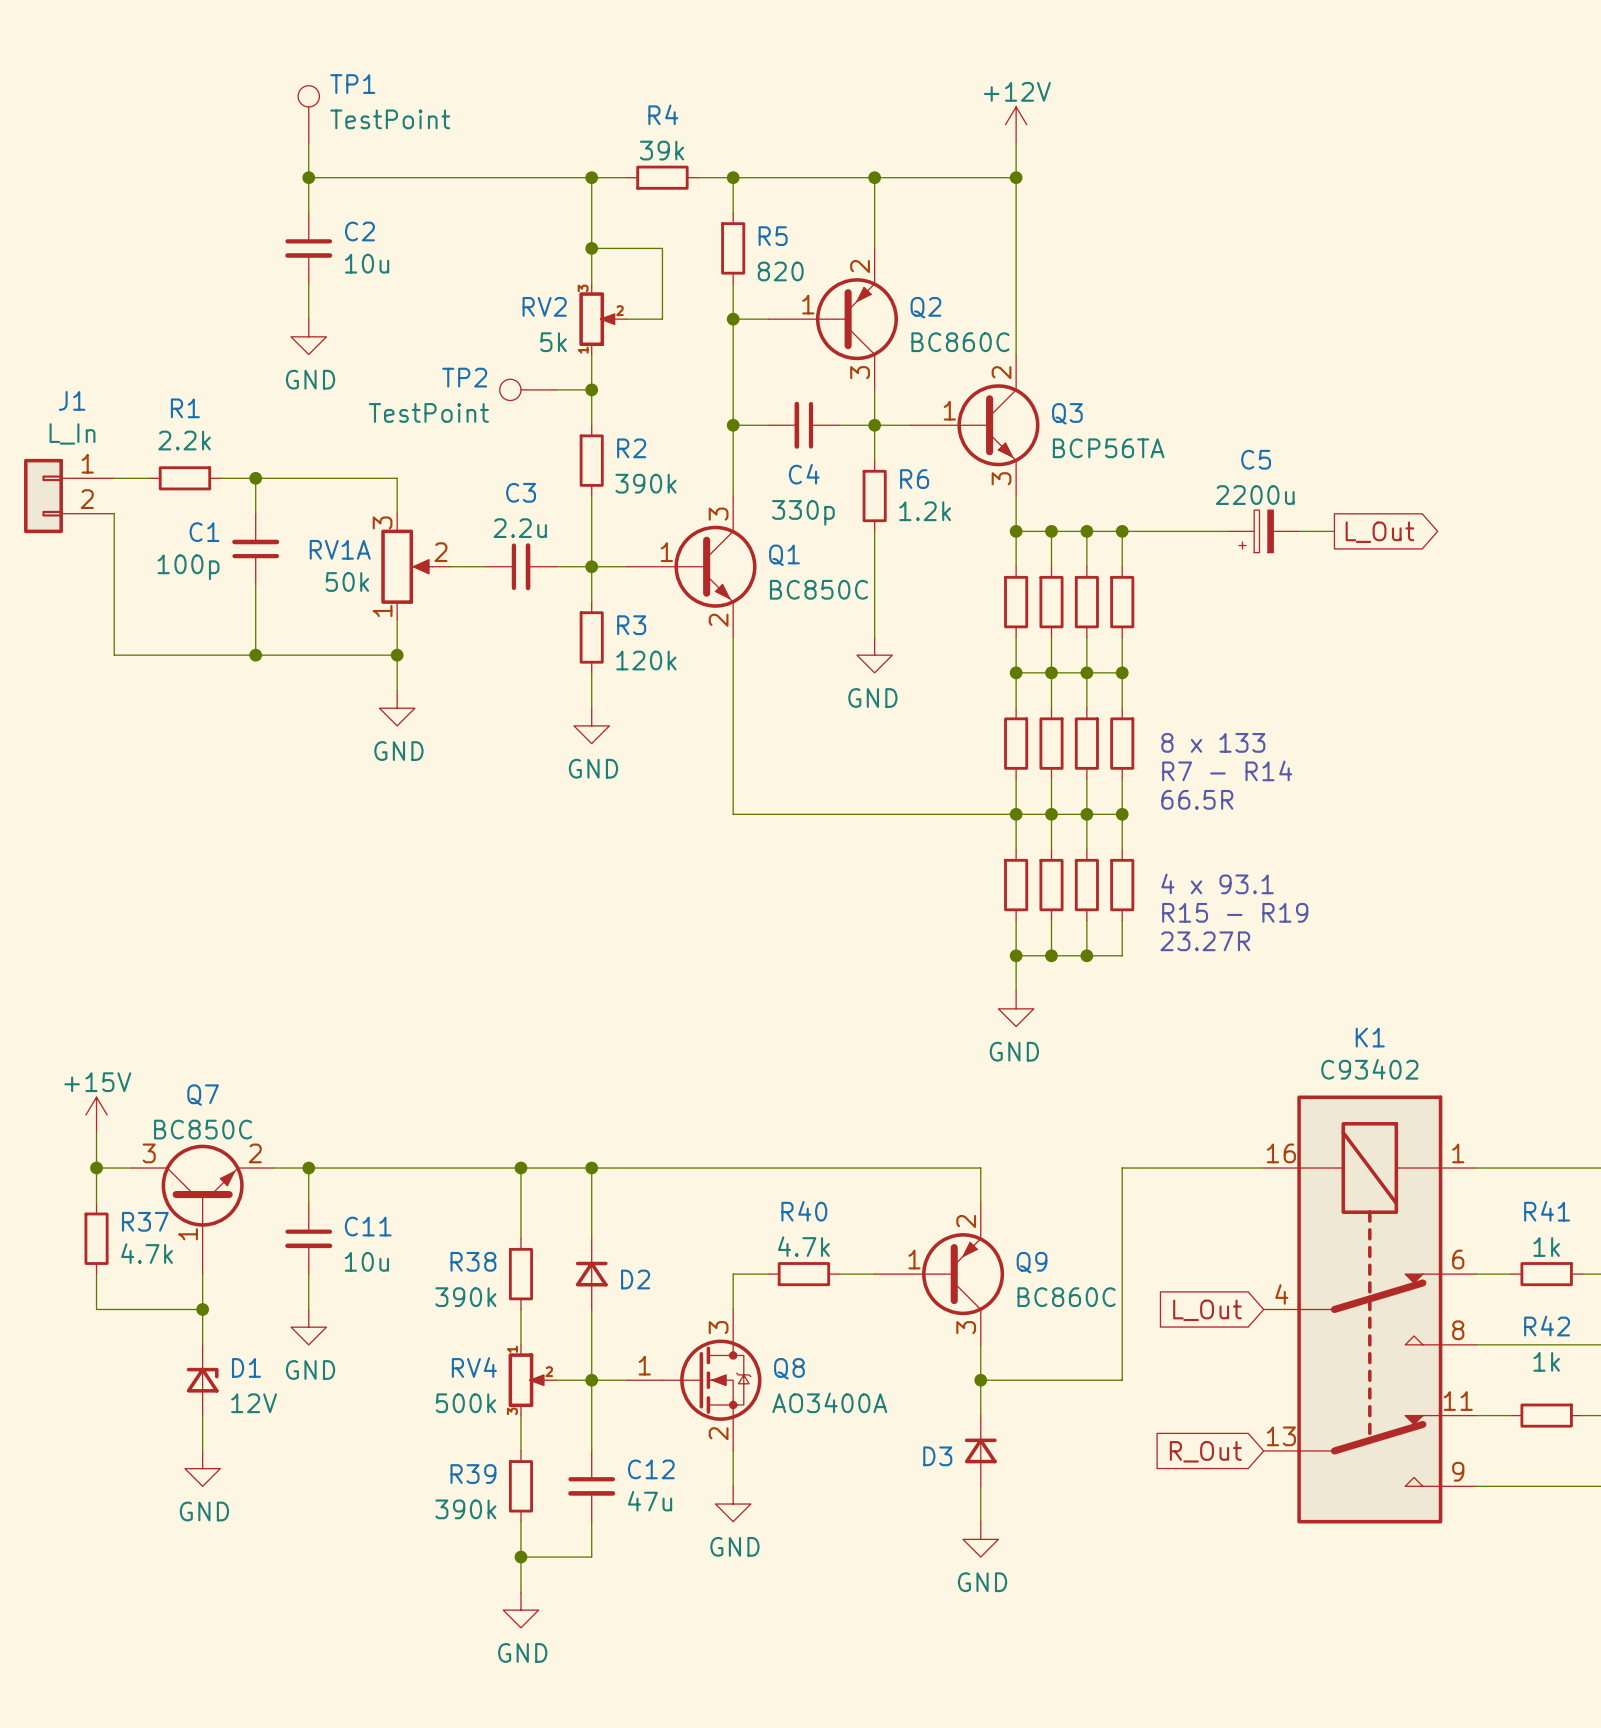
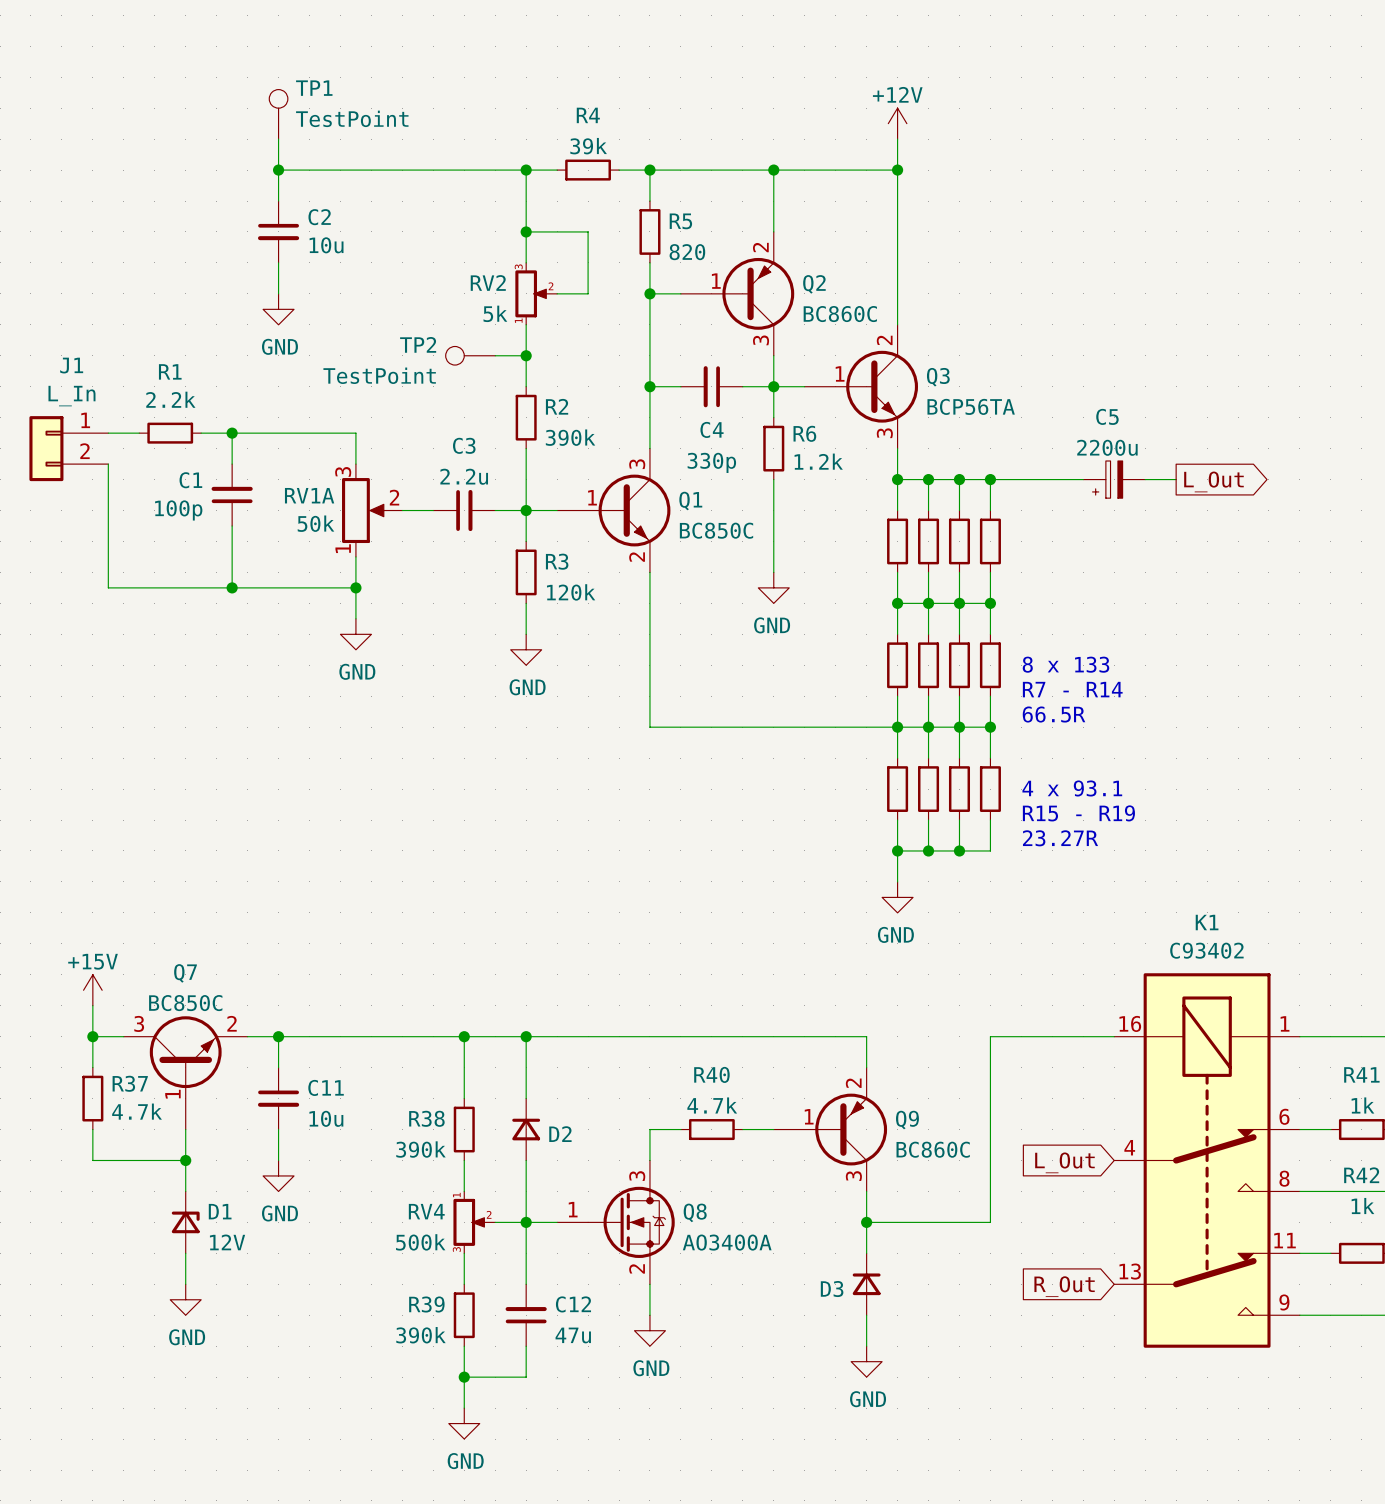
C12 rotation: 0° (591, 1486) -> 180° (526, 1315)

